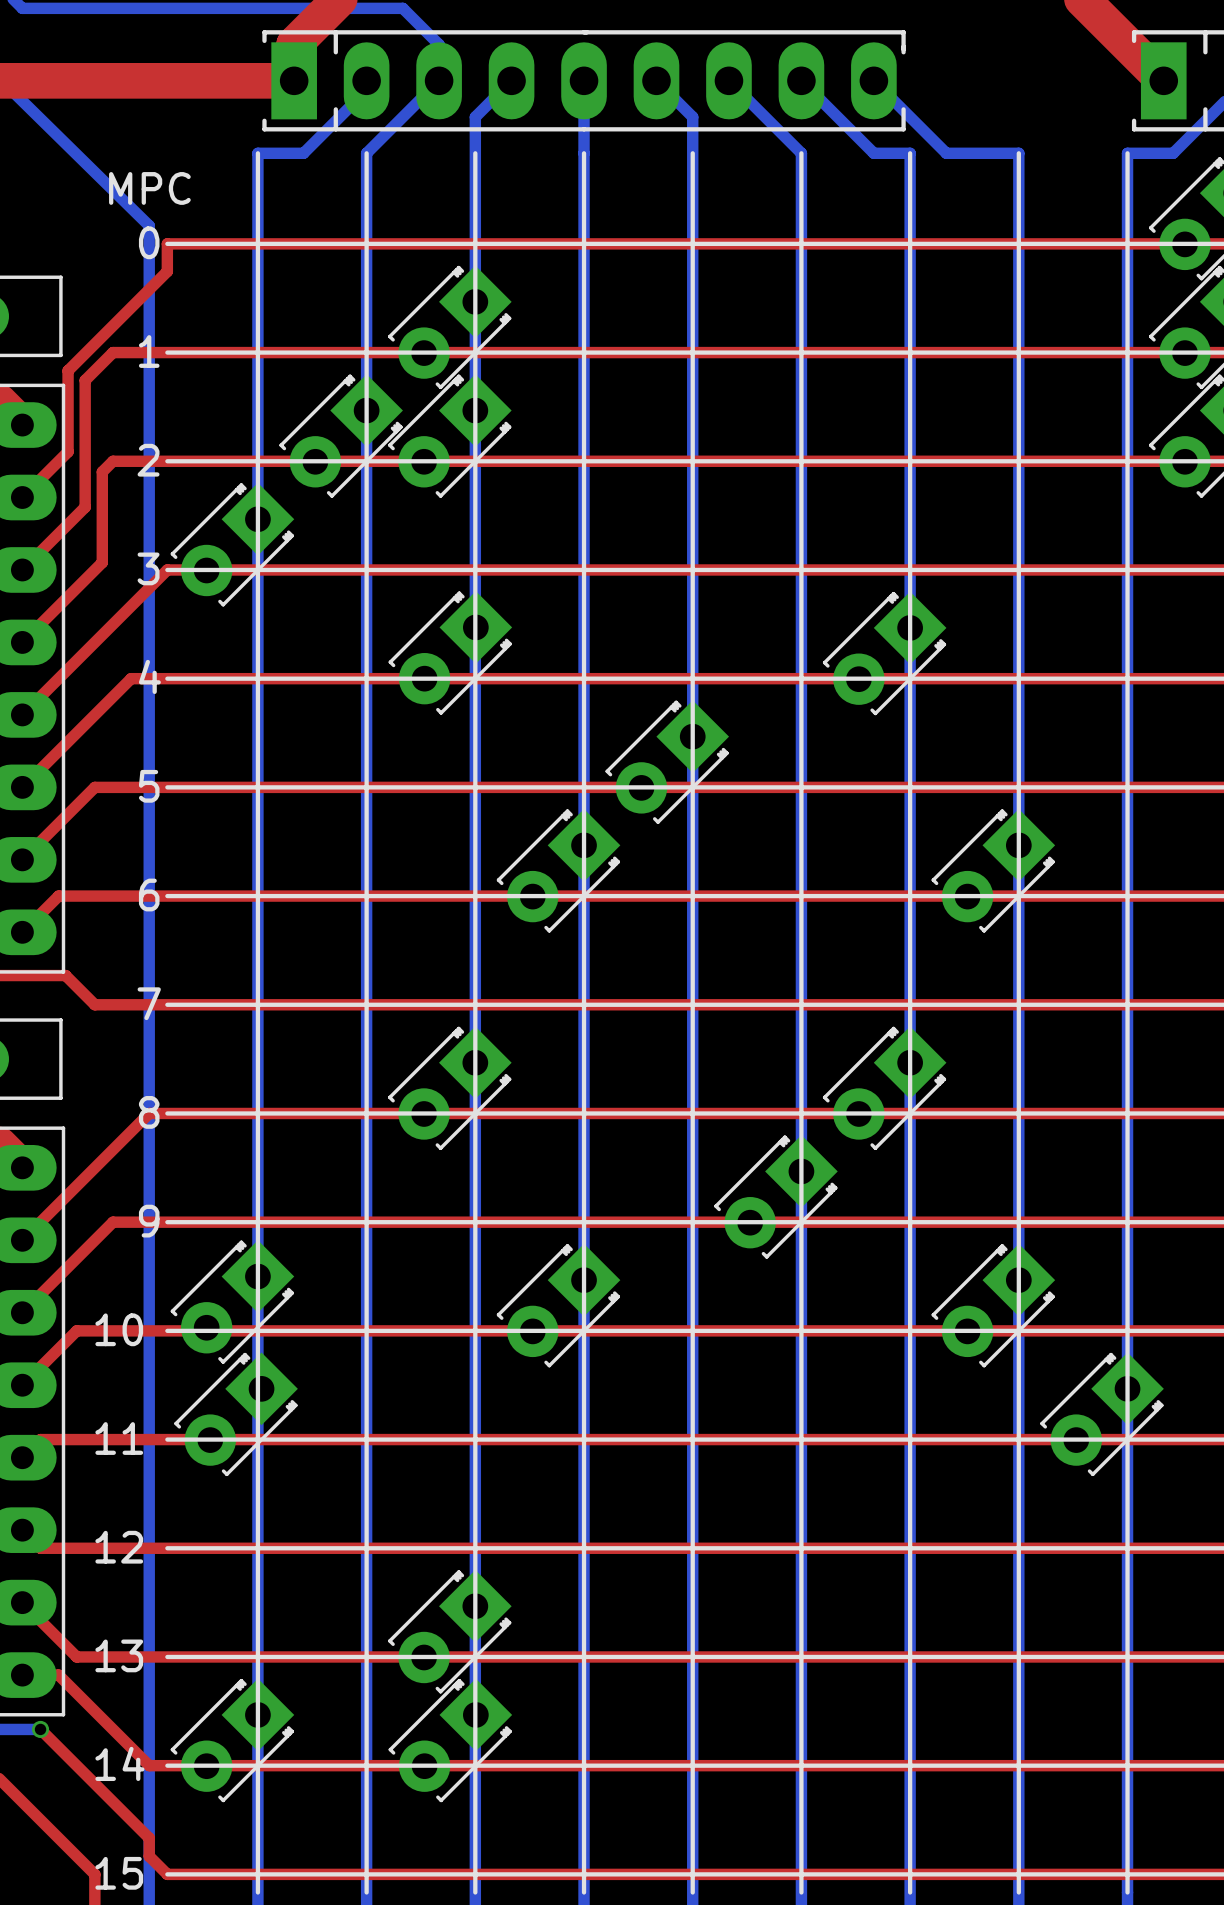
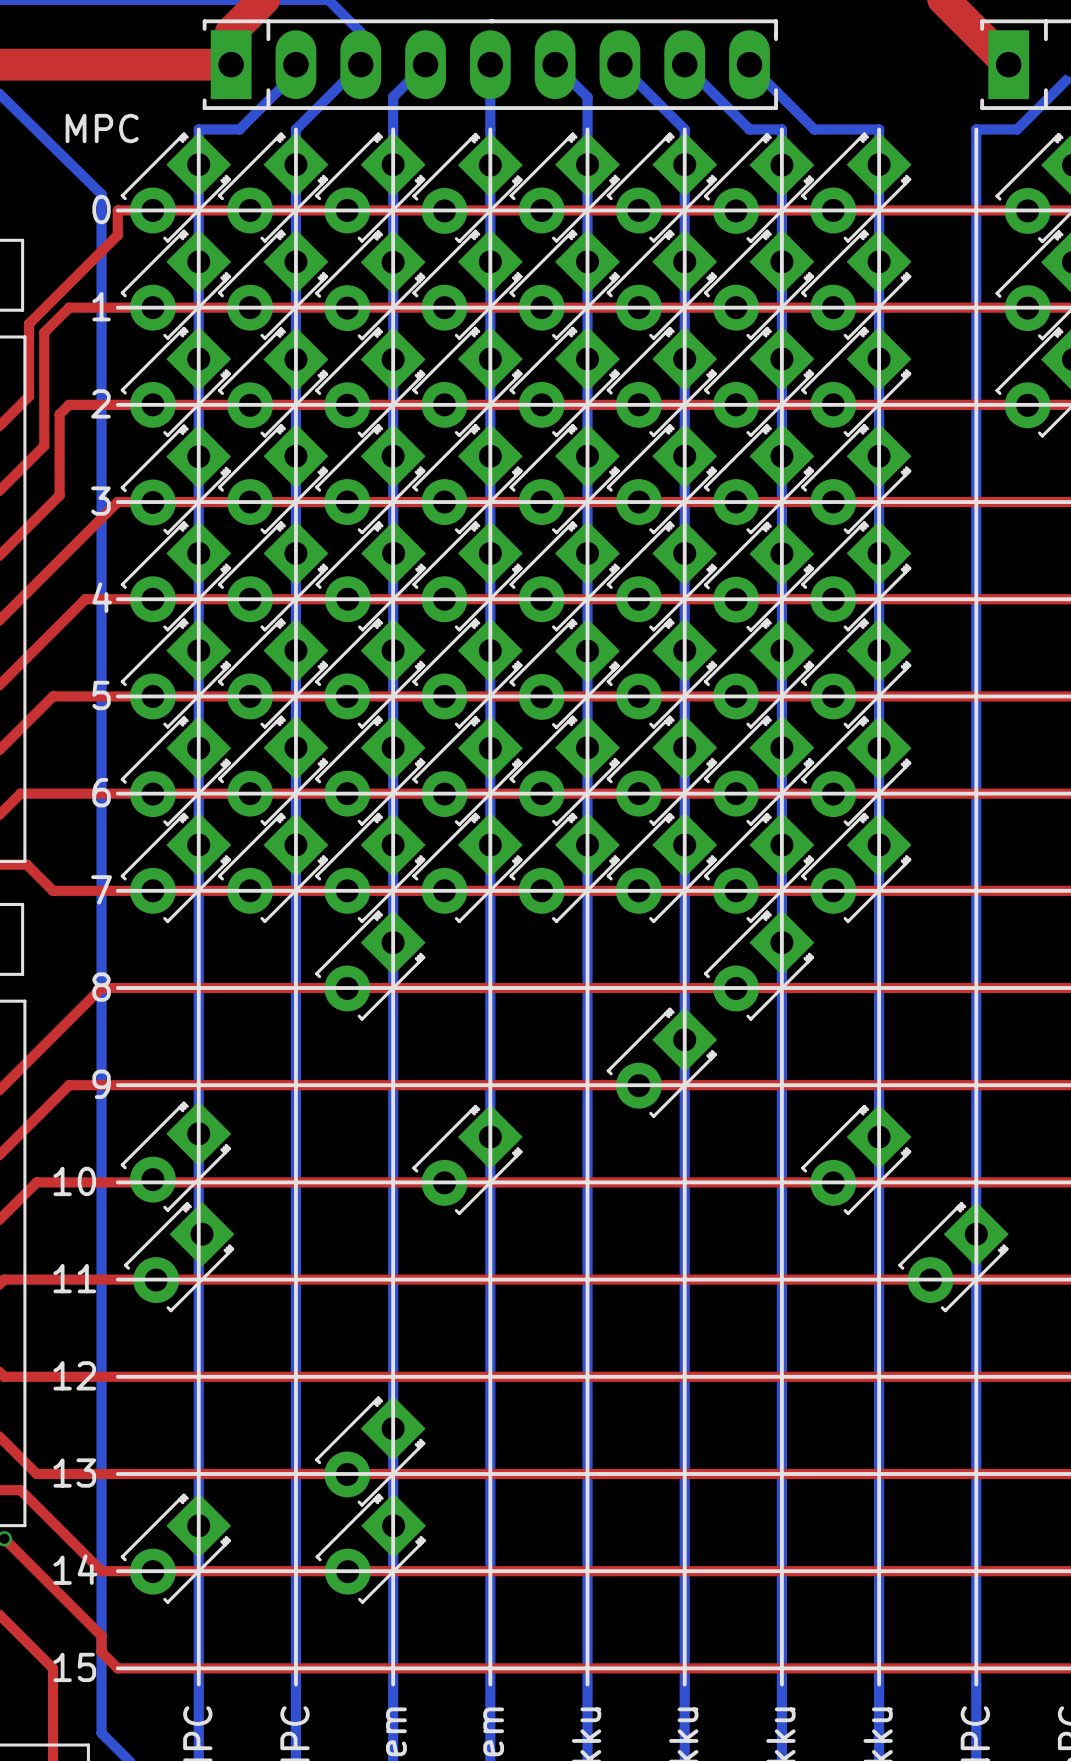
text position: MPC (149, 188) -> MPC (102, 128)
part: none -> (175, 187)
part: none -> (273, 187)
part: none -> (370, 187)
part: none -> (467, 187)
part: none -> (564, 187)
part: none -> (661, 187)
part: none -> (759, 187)
part: none -> (856, 187)
part: none -> (175, 284)
part: none -> (273, 284)
part: none -> (467, 284)
part: none -> (564, 284)
part: none -> (661, 284)
part: none -> (759, 284)
part: none -> (856, 284)
part: none -> (175, 381)
part: none -> (467, 381)
part: none -> (564, 381)
part: none -> (661, 381)
part: none -> (759, 381)
part: none -> (856, 381)
part: none -> (273, 479)
part: none -> (370, 479)
part: none -> (467, 479)
part: none -> (564, 479)
part: none -> (661, 479)
part: none -> (759, 479)
part: none -> (856, 479)
part: none -> (175, 576)
part: none -> (273, 576)
part: none -> (467, 576)
part: none -> (564, 576)
part: none -> (661, 576)
part: none -> (856, 576)
part: none -> (175, 673)
part: none -> (273, 673)
part: none -> (370, 673)
part: none -> (467, 673)
part: none -> (661, 673)
part: none -> (759, 673)
part: none -> (856, 673)
part: none -> (175, 771)
part: none -> (273, 770)
part: none -> (370, 770)
part: none -> (564, 770)
part: none -> (661, 770)
part: none -> (759, 770)
part: none -> (175, 867)
part: none -> (273, 867)
part: none -> (370, 867)
part: none -> (467, 867)
part: none -> (564, 867)
part: none -> (661, 867)
part: none -> (759, 867)
part: none -> (856, 867)

